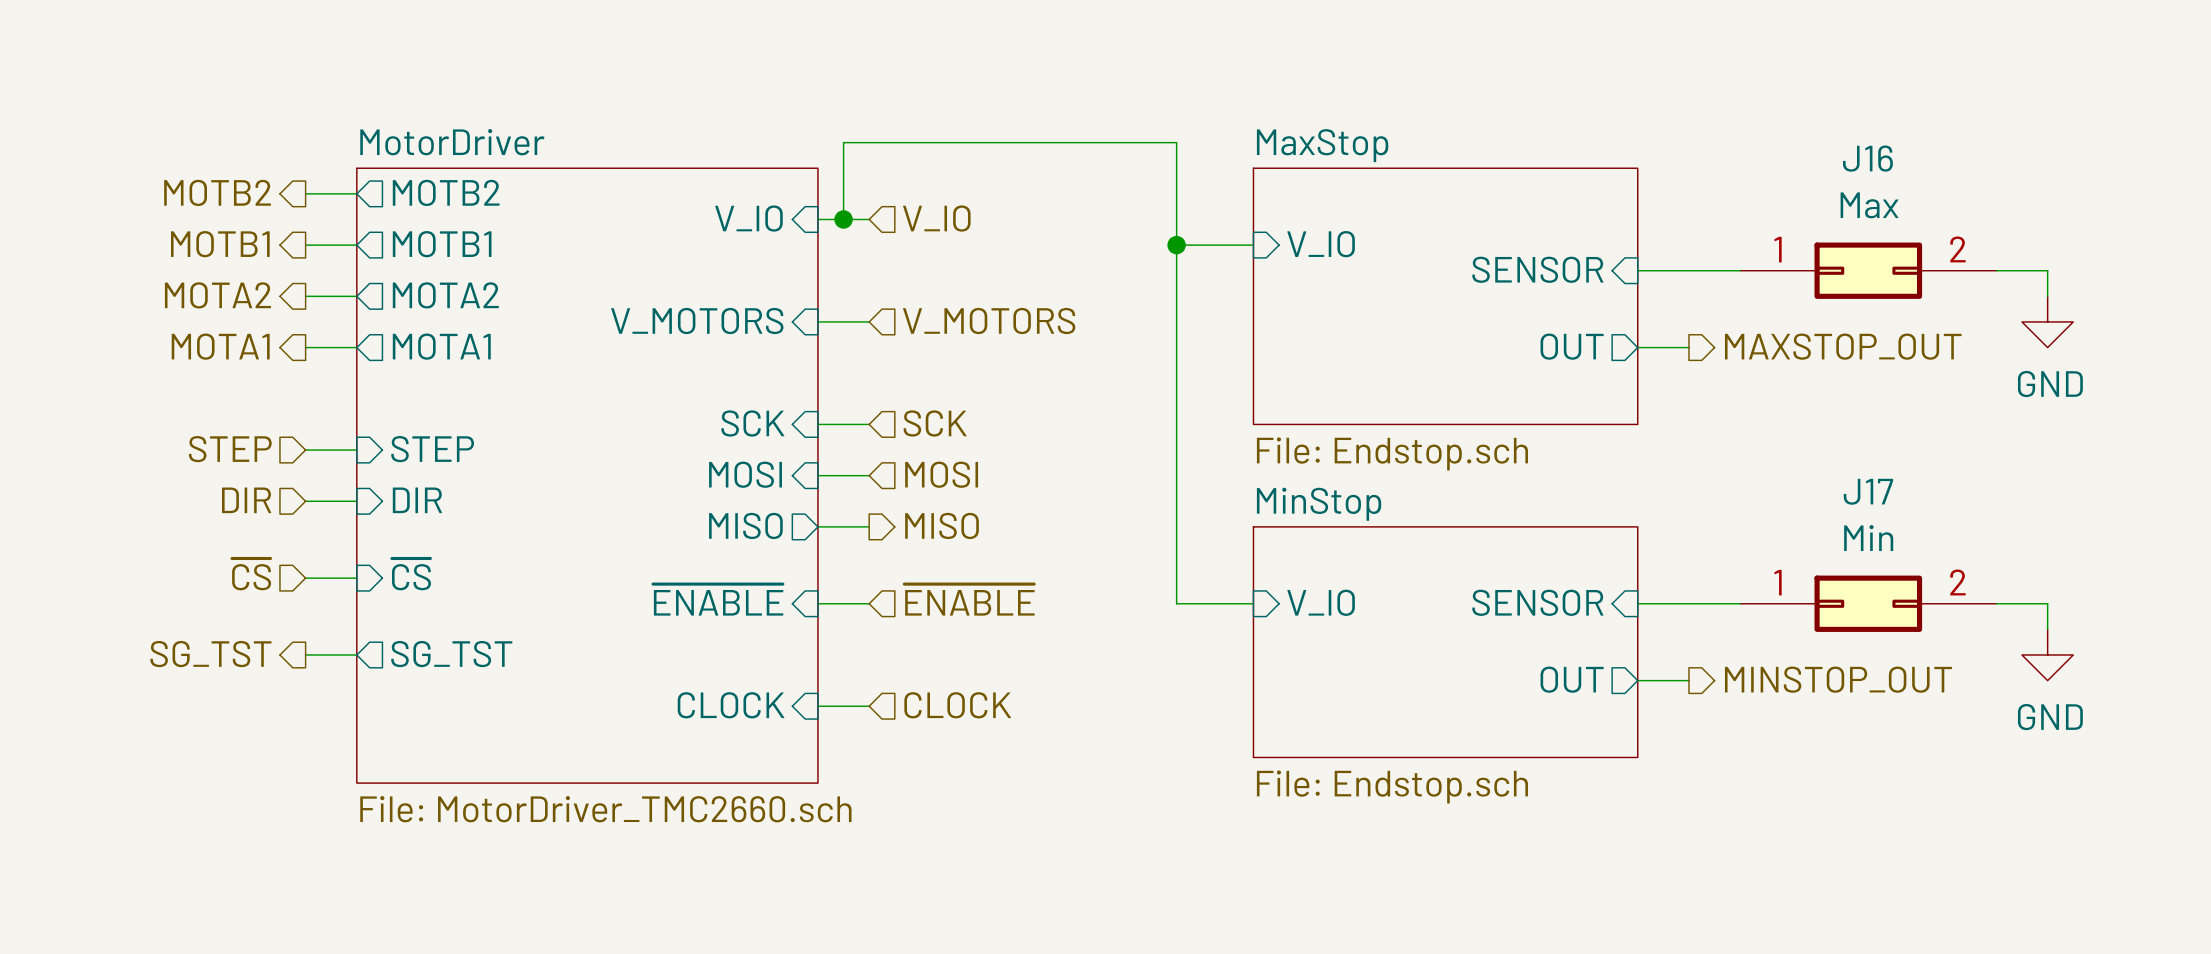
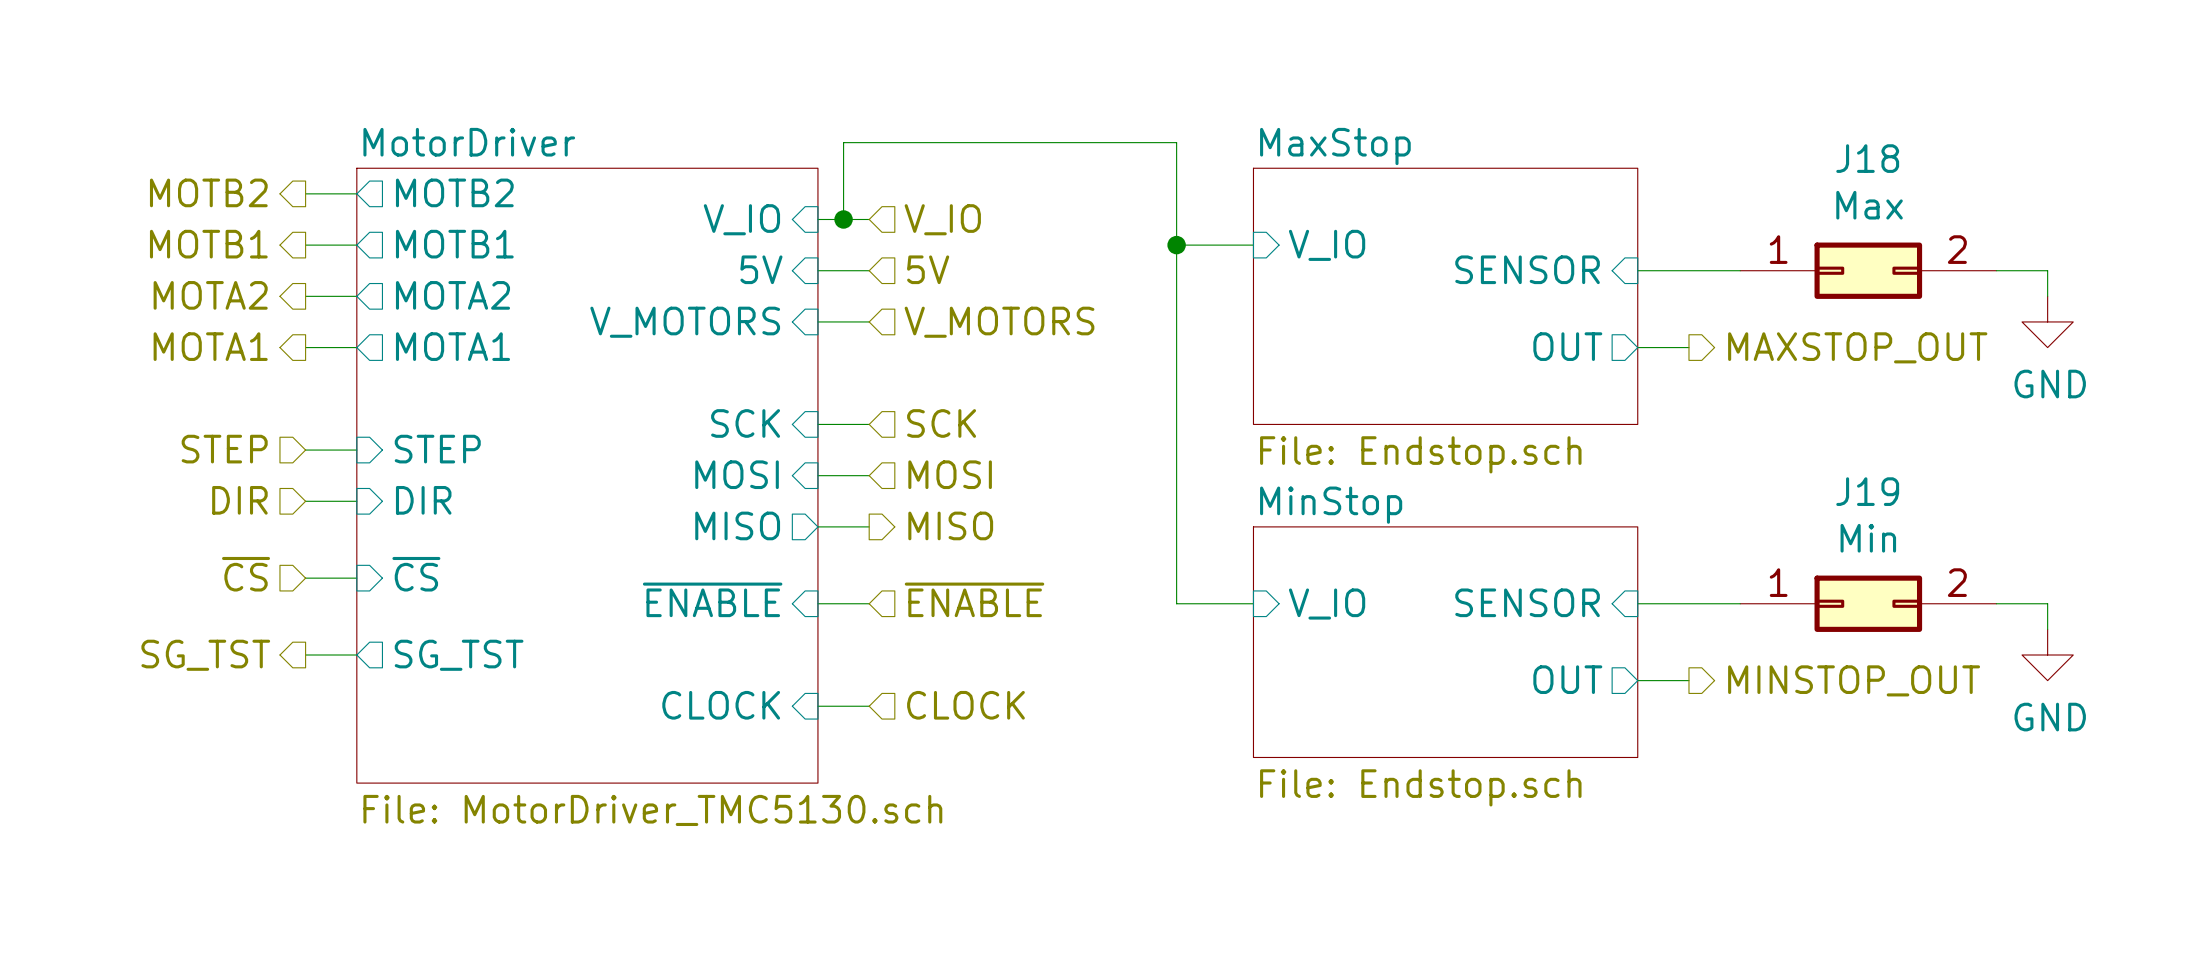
J16 name: J16 (1867, 158) -> J18 (1867, 158)
sheet pin: none -> 5V (761, 269)
hierarchical label: none -> 5V (928, 269)
wire: none -> (817, 270) (869, 270)
J17 name: J17 (1868, 491) -> J19 (1867, 491)
sheet MotorDriver value: File: MotorDriver_TMC2660.sch (605, 809) -> File: MotorDriver_TMC5130.sch (652, 810)

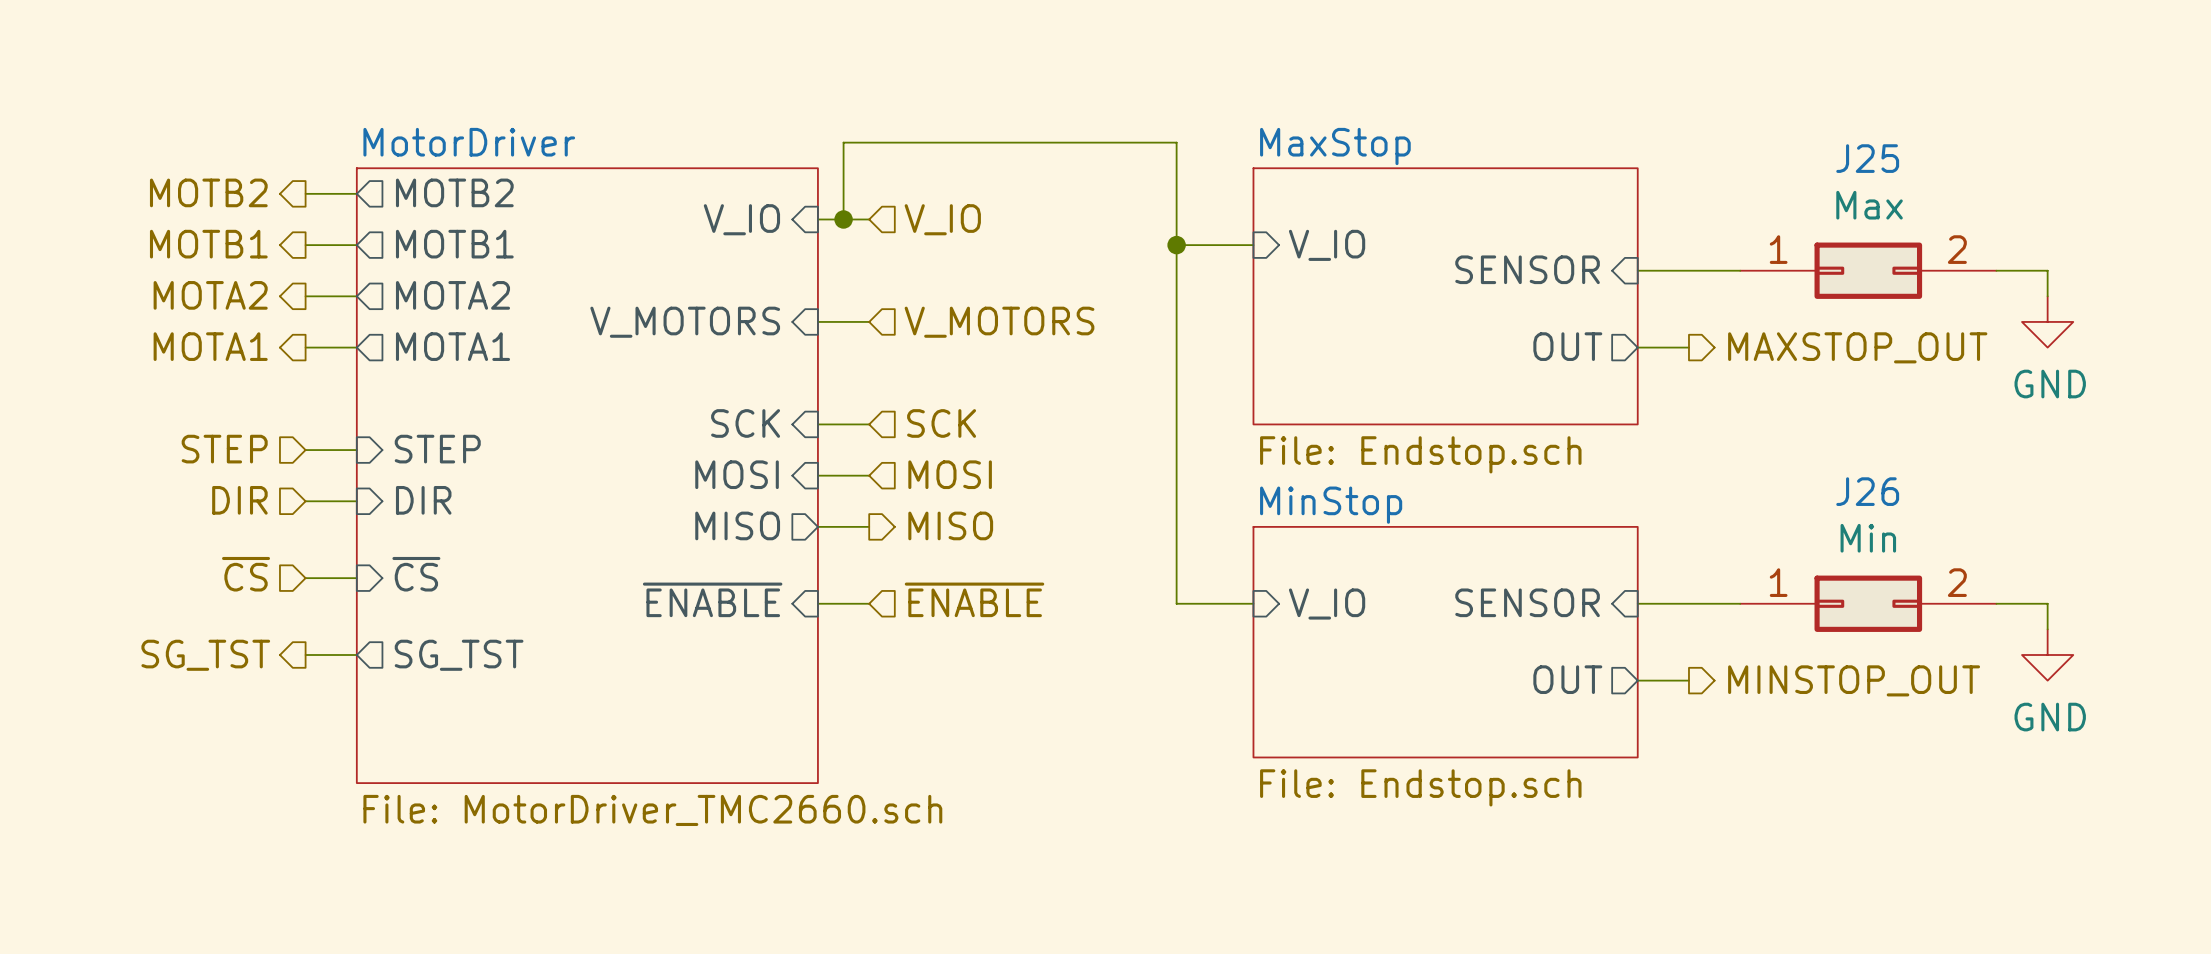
J18 name: J18 (1867, 158) -> J25 (1867, 158)
sheet pin: 5V (761, 269) -> none
hierarchical label: 5V (928, 269) -> none
wire: (817, 270) (869, 270) -> none
J19 name: J19 (1867, 491) -> J26 (1867, 491)
sheet pin: CLOCK (721, 705) -> none
hierarchical label: CLOCK (965, 705) -> none
wire: (817, 706) (869, 706) -> none
sheet MotorDriver value: File: MotorDriver_TMC5130.sch (652, 810) -> File: MotorDriver_TMC2660.sch (652, 810)

